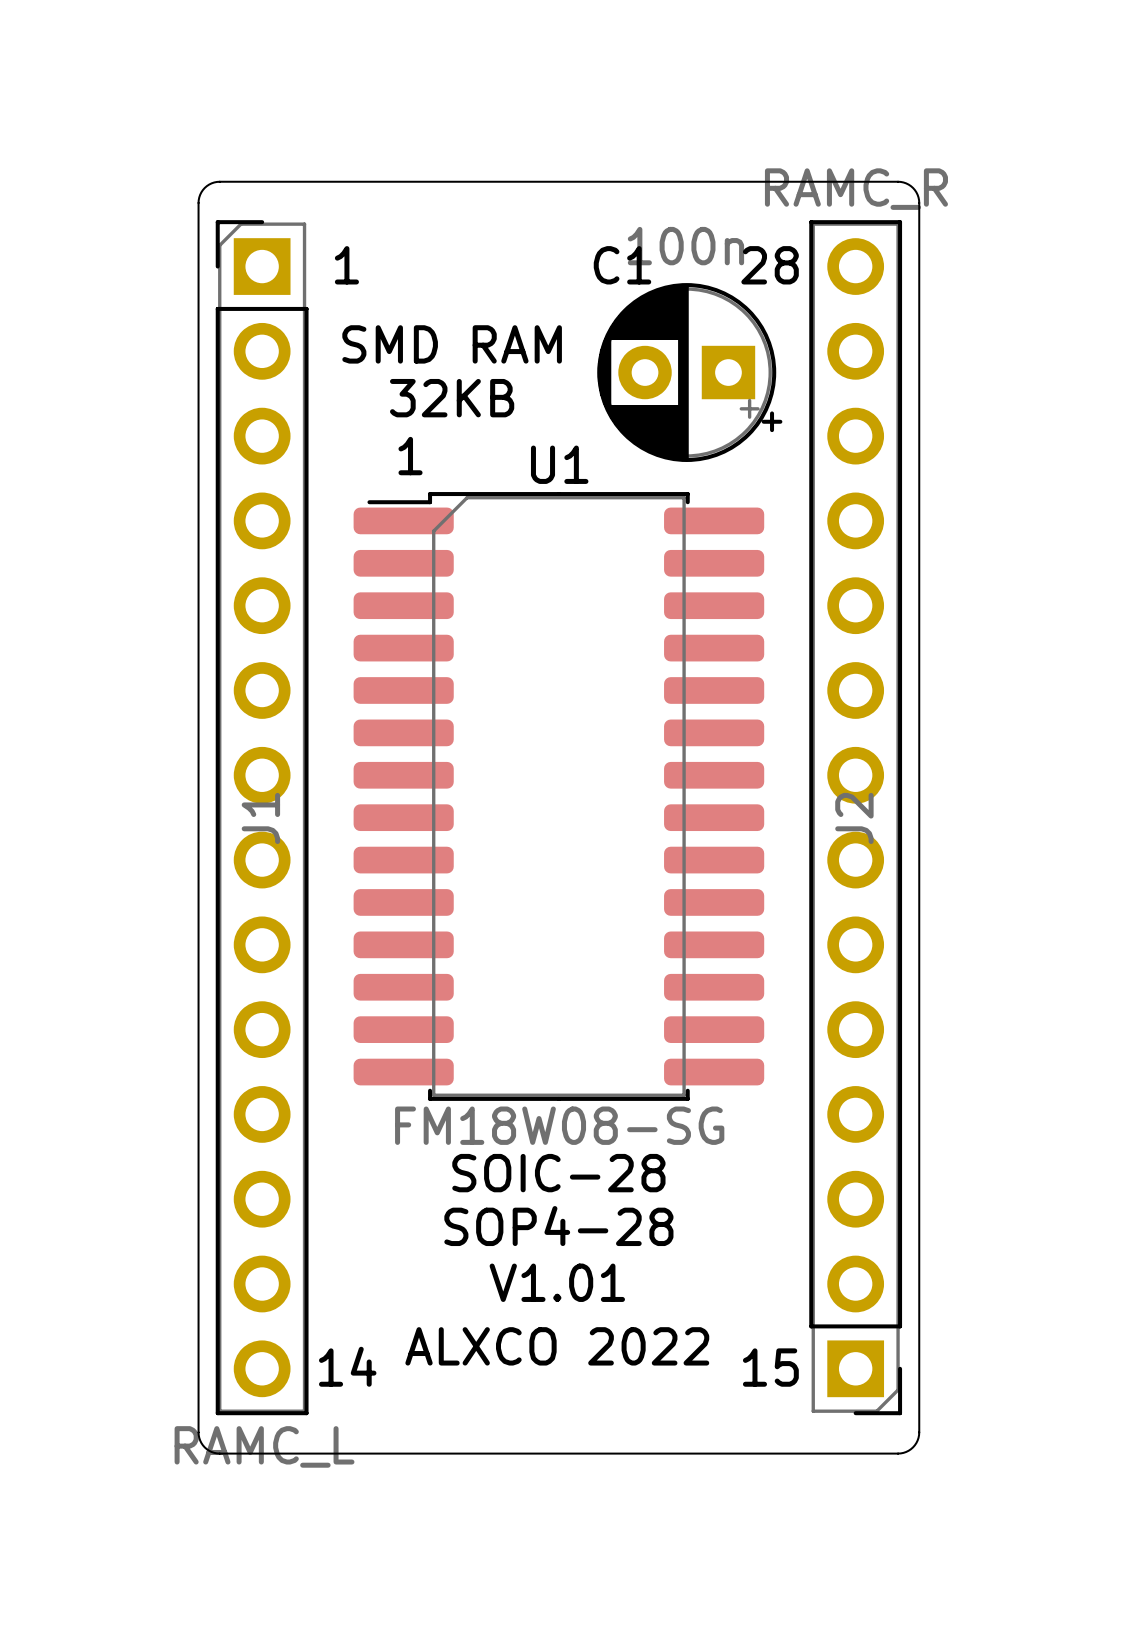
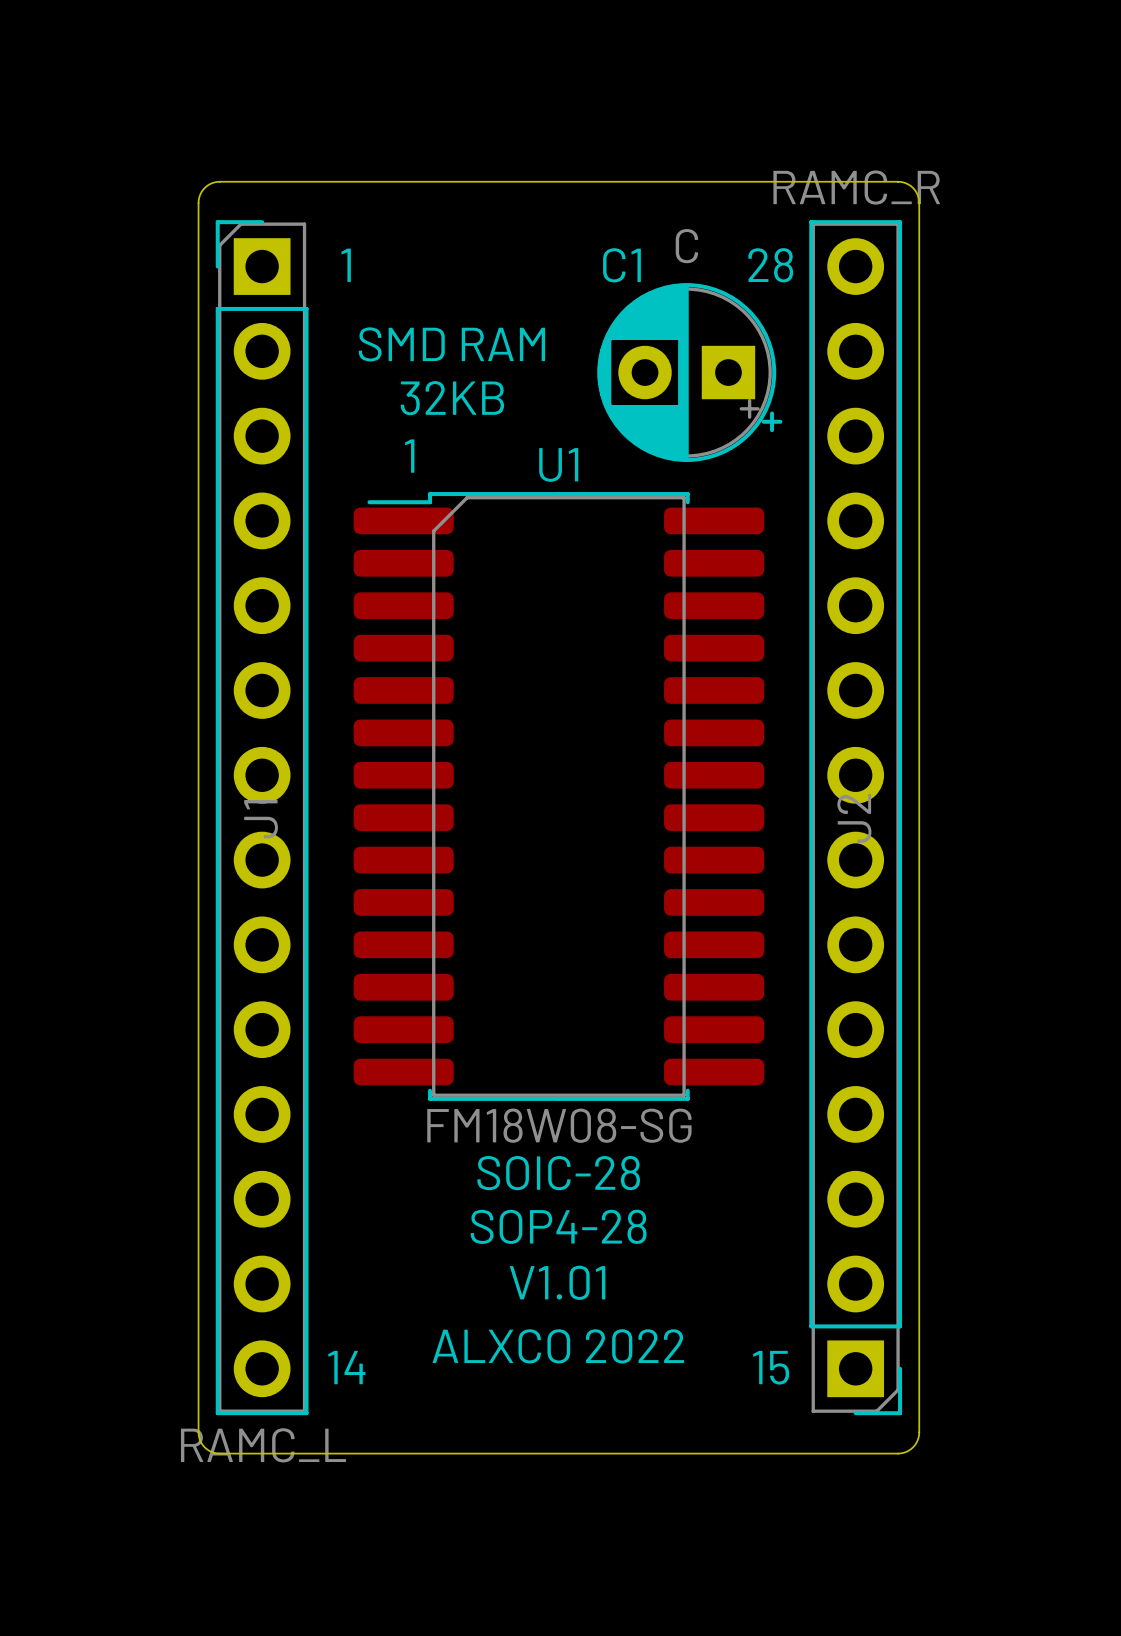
C1 value: 100n (685, 246) -> C (686, 246)

